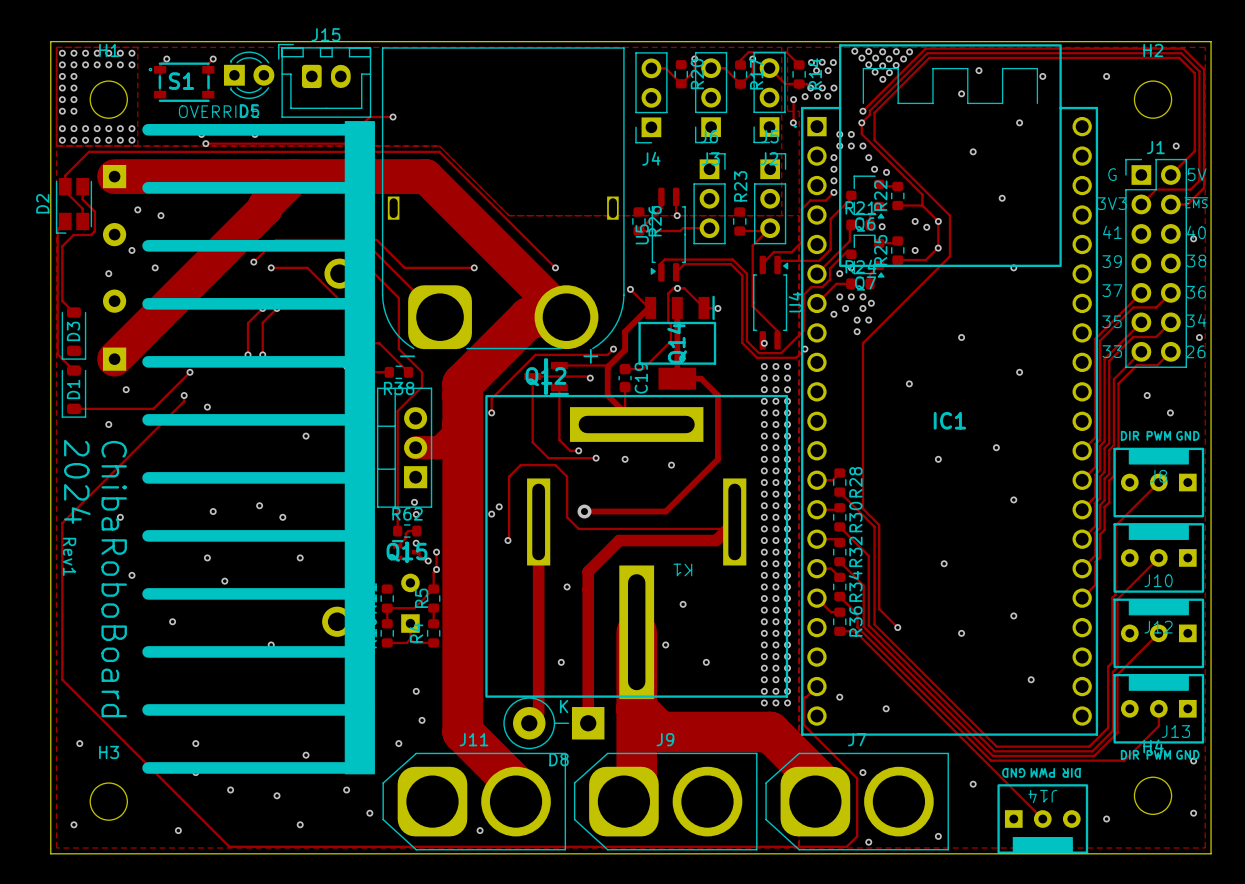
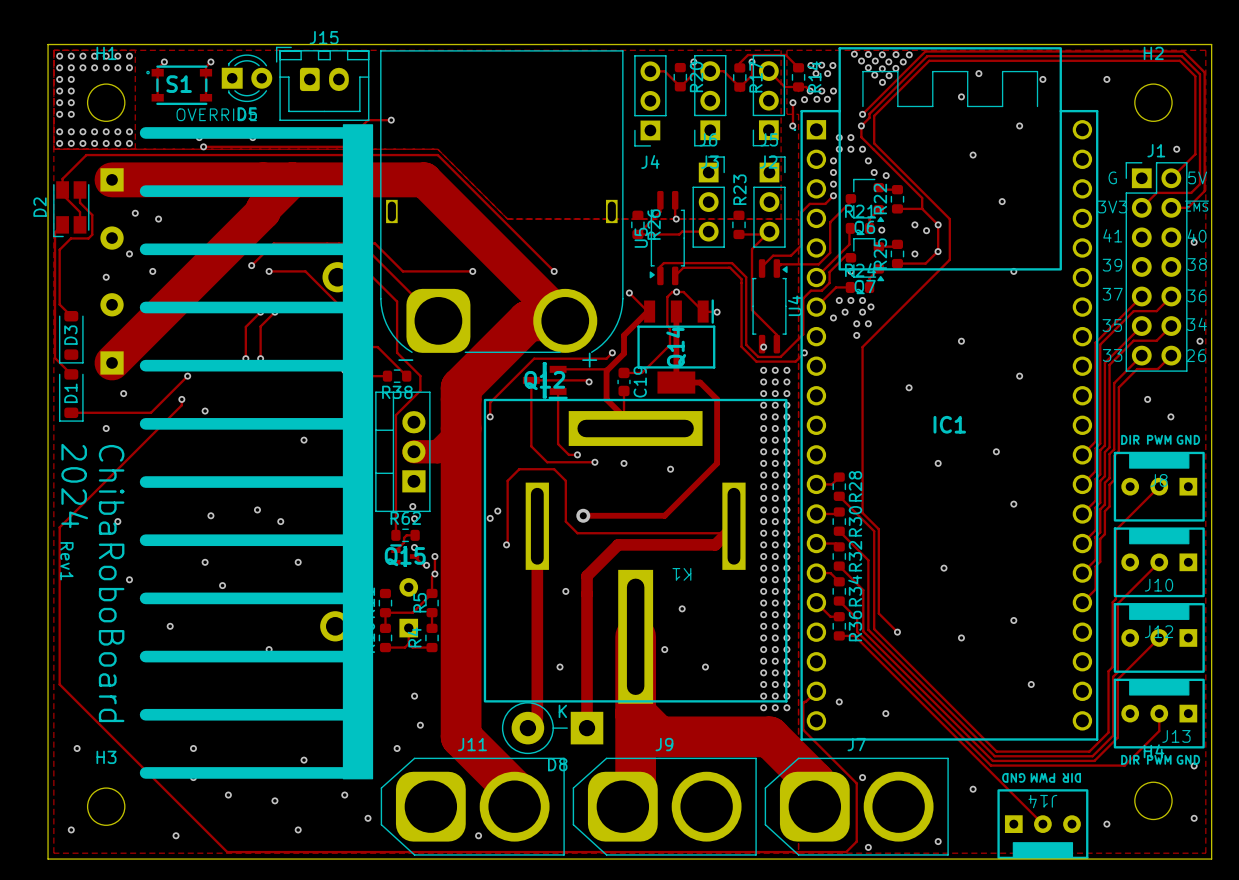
via: (839, 273) -> none

